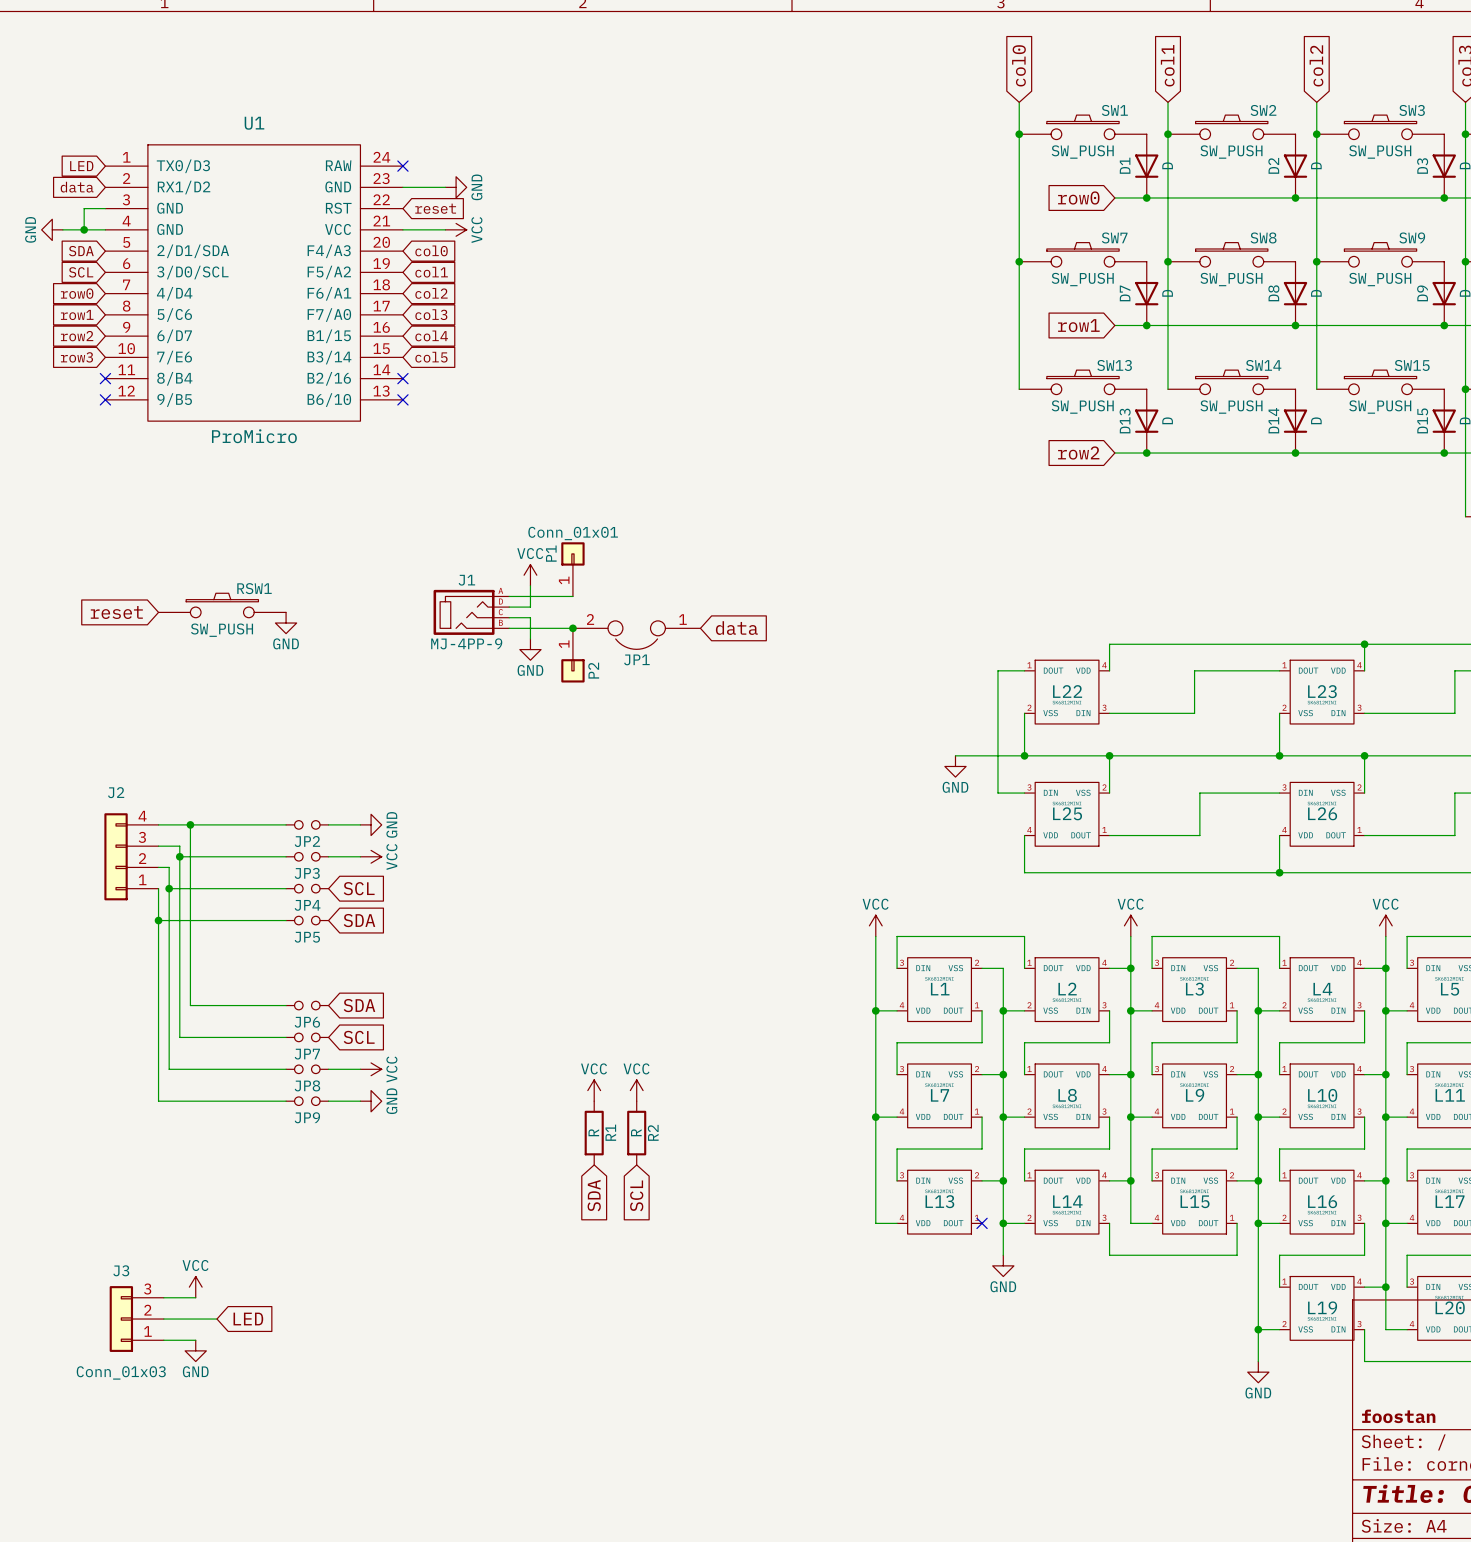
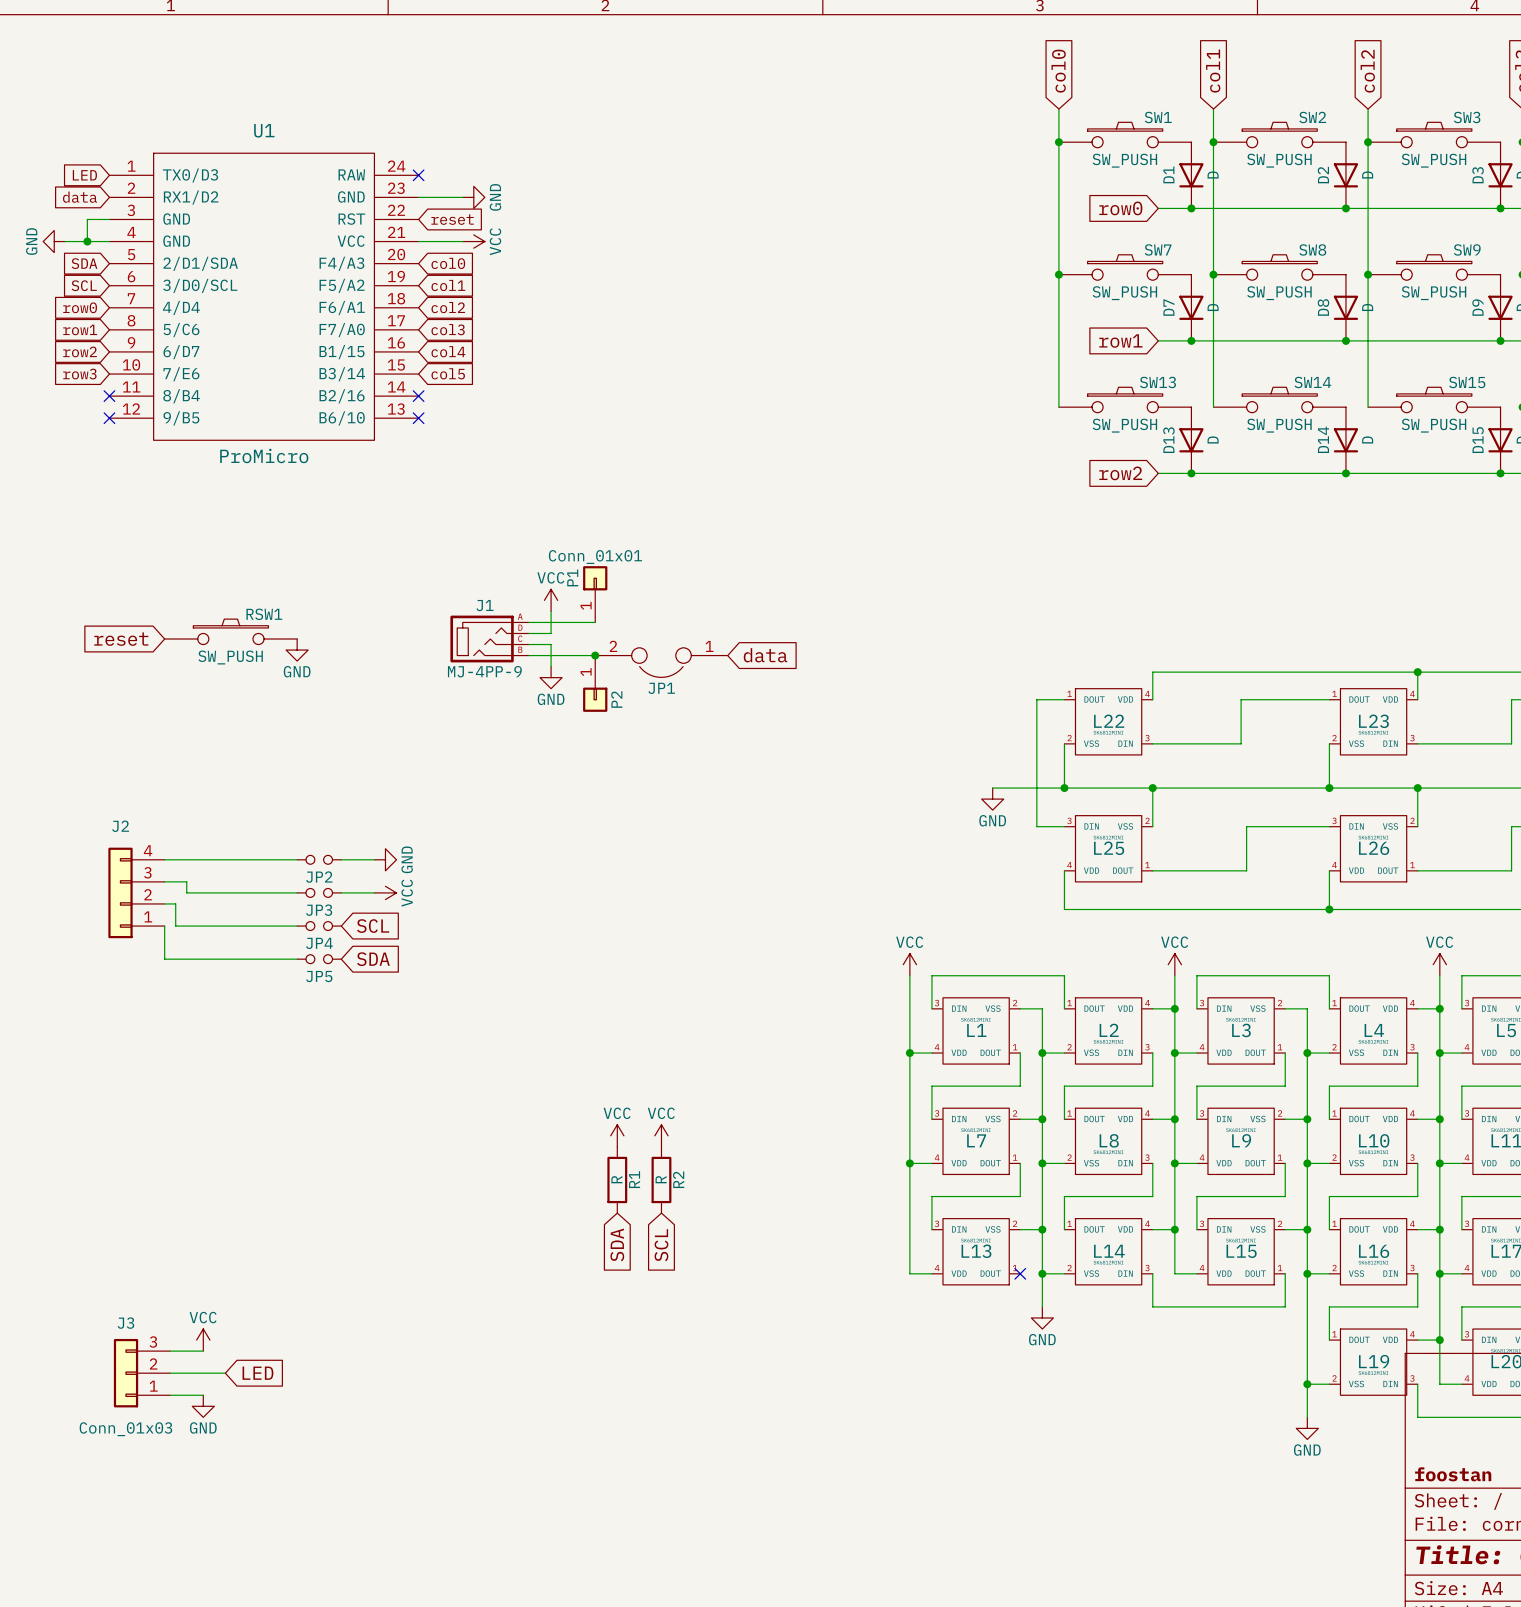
wire: (190, 824) (190, 1005) (286, 1005) -> none
junction: (190, 824) -> none
wire: (179, 856) (179, 1037) (286, 1037) -> none
junction: (179, 856) -> none
wire: (169, 888) (169, 1069) (286, 1069) -> none
junction: (169, 888) -> none
wire: (158, 920) (158, 1101) (286, 1101) -> none
junction: (158, 920) -> none
JP6: (307, 1005) -> none
global label: SDA (359, 1005) -> none
JP7: (307, 1037) -> none
global label: SCL (359, 1037) -> none
JP8: (307, 1069) -> none
wire: (328, 1069) (360, 1069) -> none
power symbol: VCC (371, 1069) -> none
JP9: (307, 1101) -> none
wire: (328, 1101) (360, 1101) -> none
power symbol: GND (371, 1101) -> none

